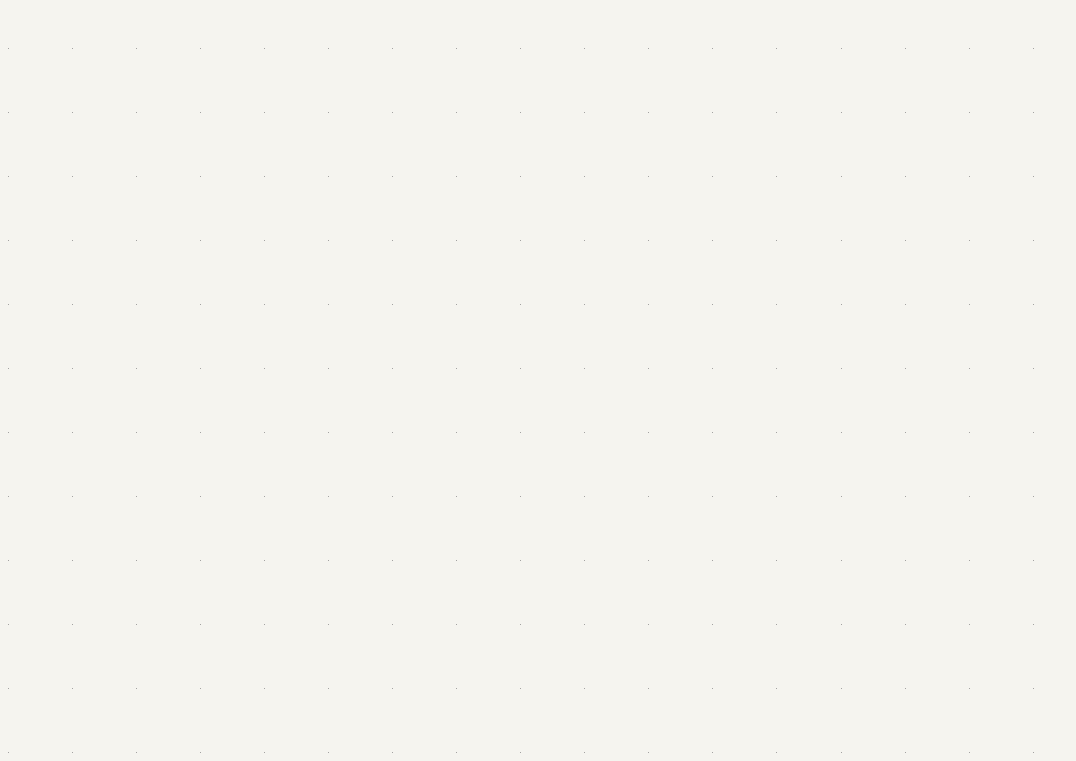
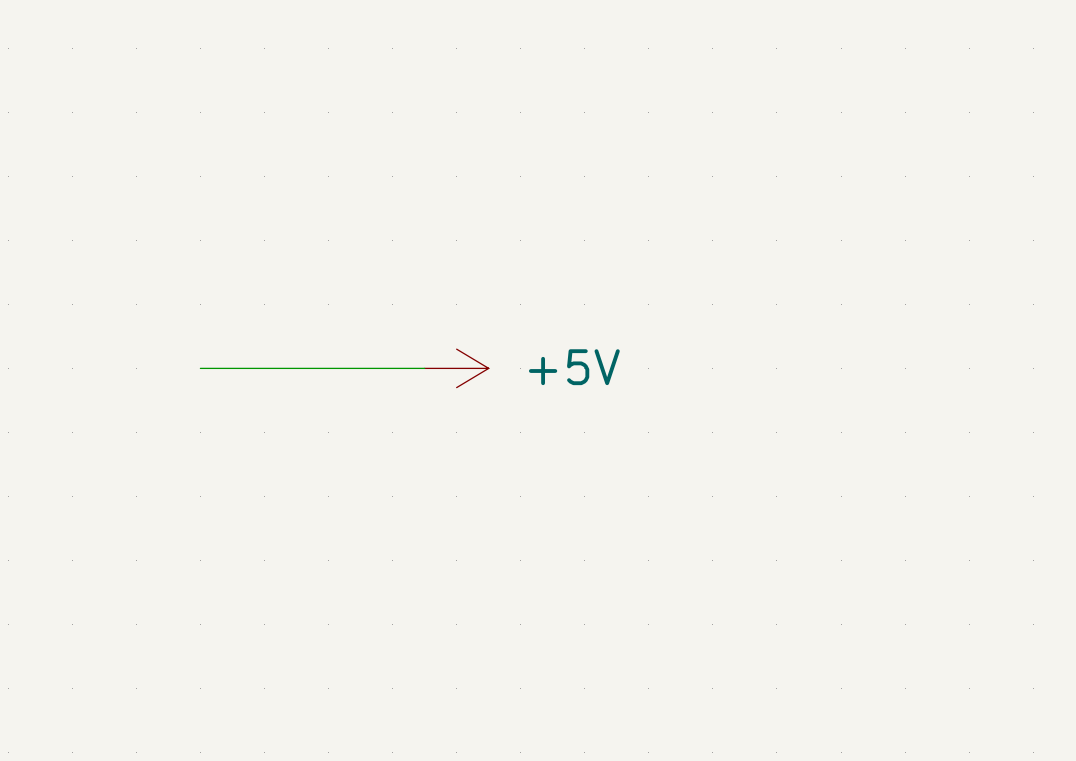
wire: none -> (200, 368) (424, 368)
power symbol: none -> +5V (456, 368)

